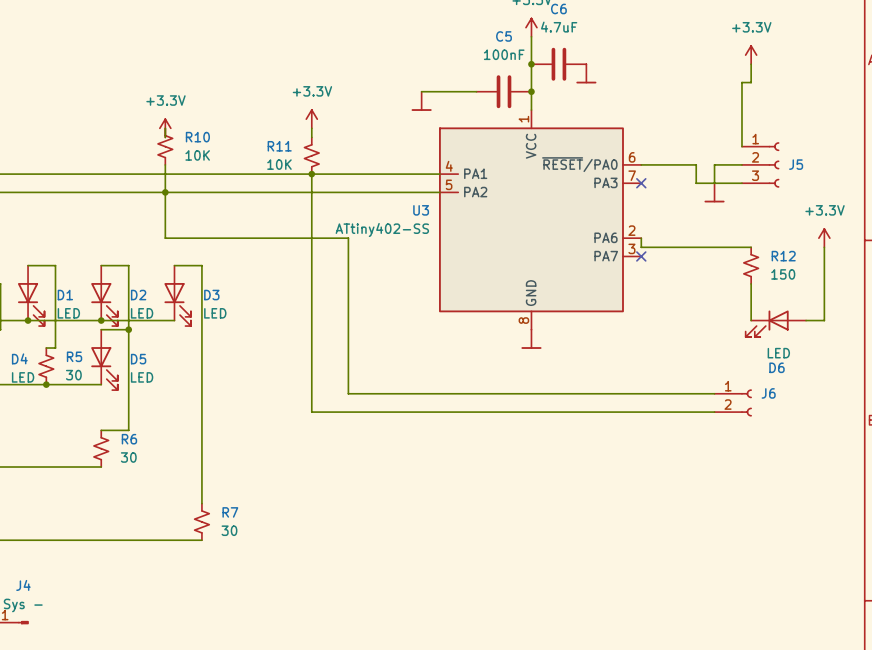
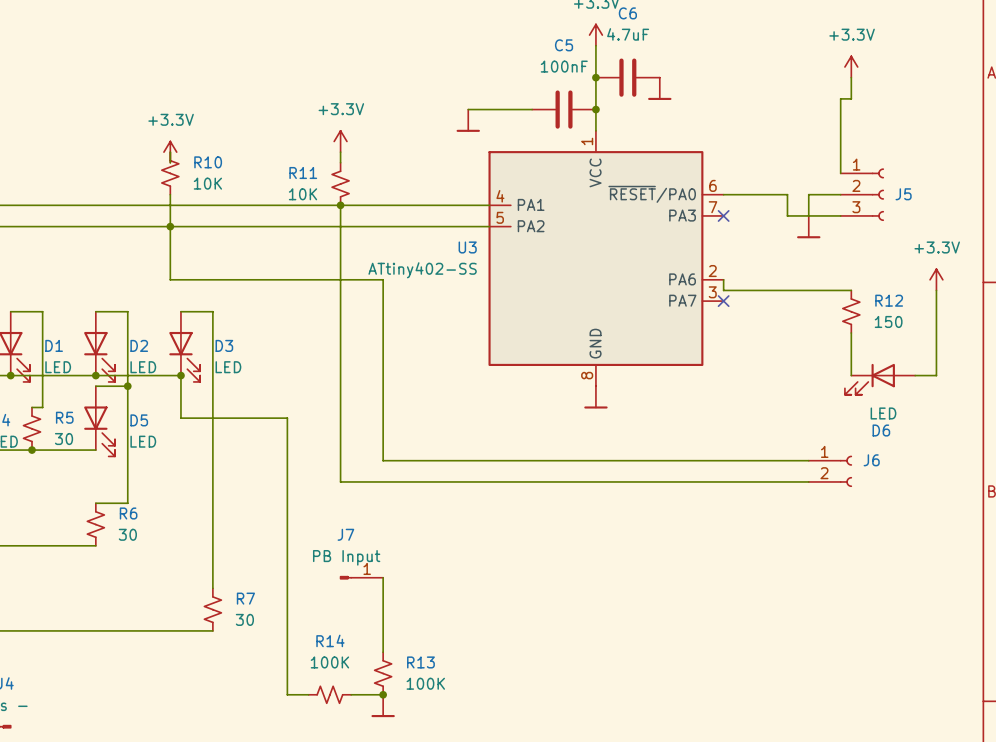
wire: none -> (180, 375) (180, 418) (287, 418) (287, 694) (308, 694)
junction: none -> (180, 375)
J7: none -> PB Input (361, 577)
wire: none -> (383, 577) (383, 652)
R13: none -> 100K (383, 673)
R14: none -> 100K (329, 694)
wire: none -> (351, 694) (383, 694)
junction: none -> (383, 694)
power symbol: none -> (383, 705)

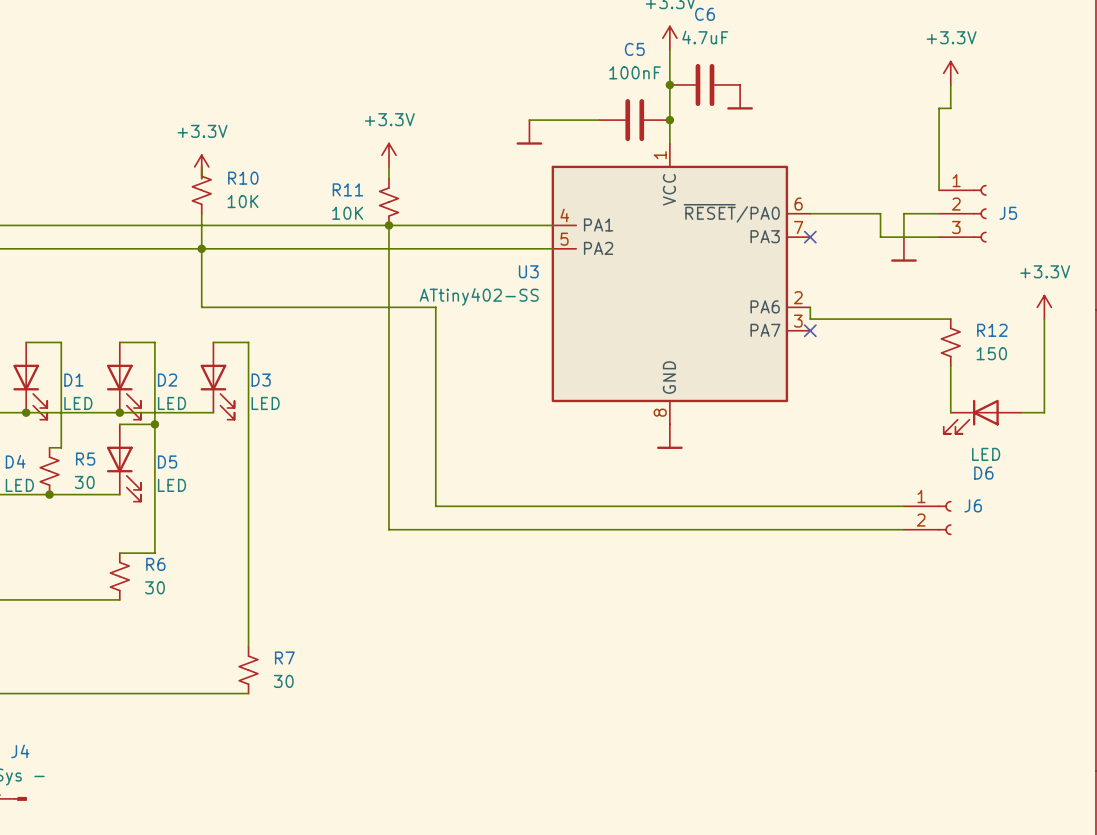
wire: (180, 375) (180, 418) (287, 418) (287, 694) (308, 694) -> none
junction: (180, 375) -> none
J7: PB Input (361, 577) -> none
wire: (383, 577) (383, 652) -> none
R13: 100K (383, 673) -> none
R14: 100K (329, 694) -> none
wire: (351, 694) (383, 694) -> none
junction: (383, 694) -> none
power symbol: (383, 705) -> none

